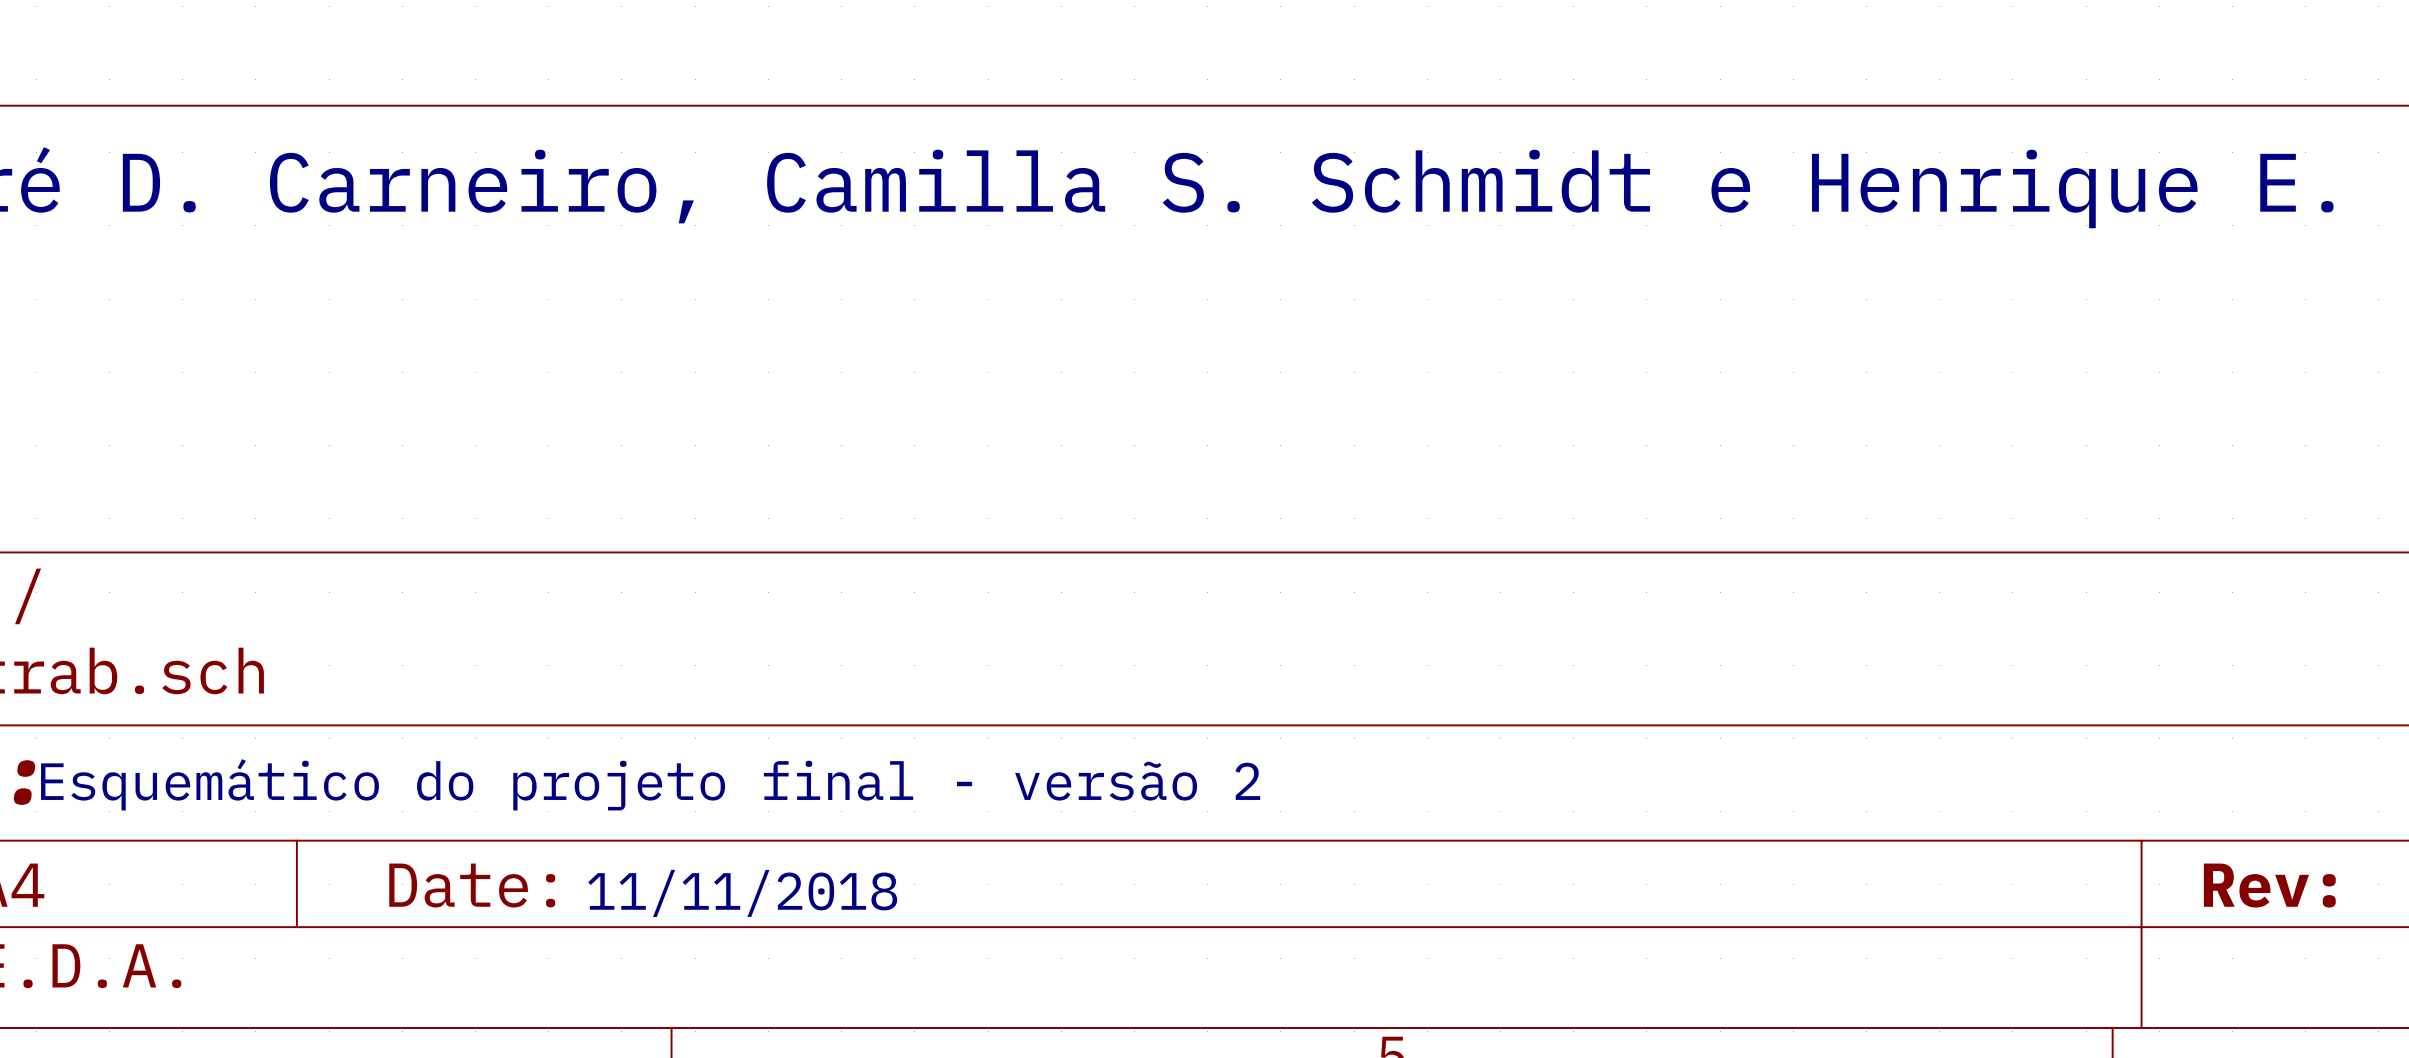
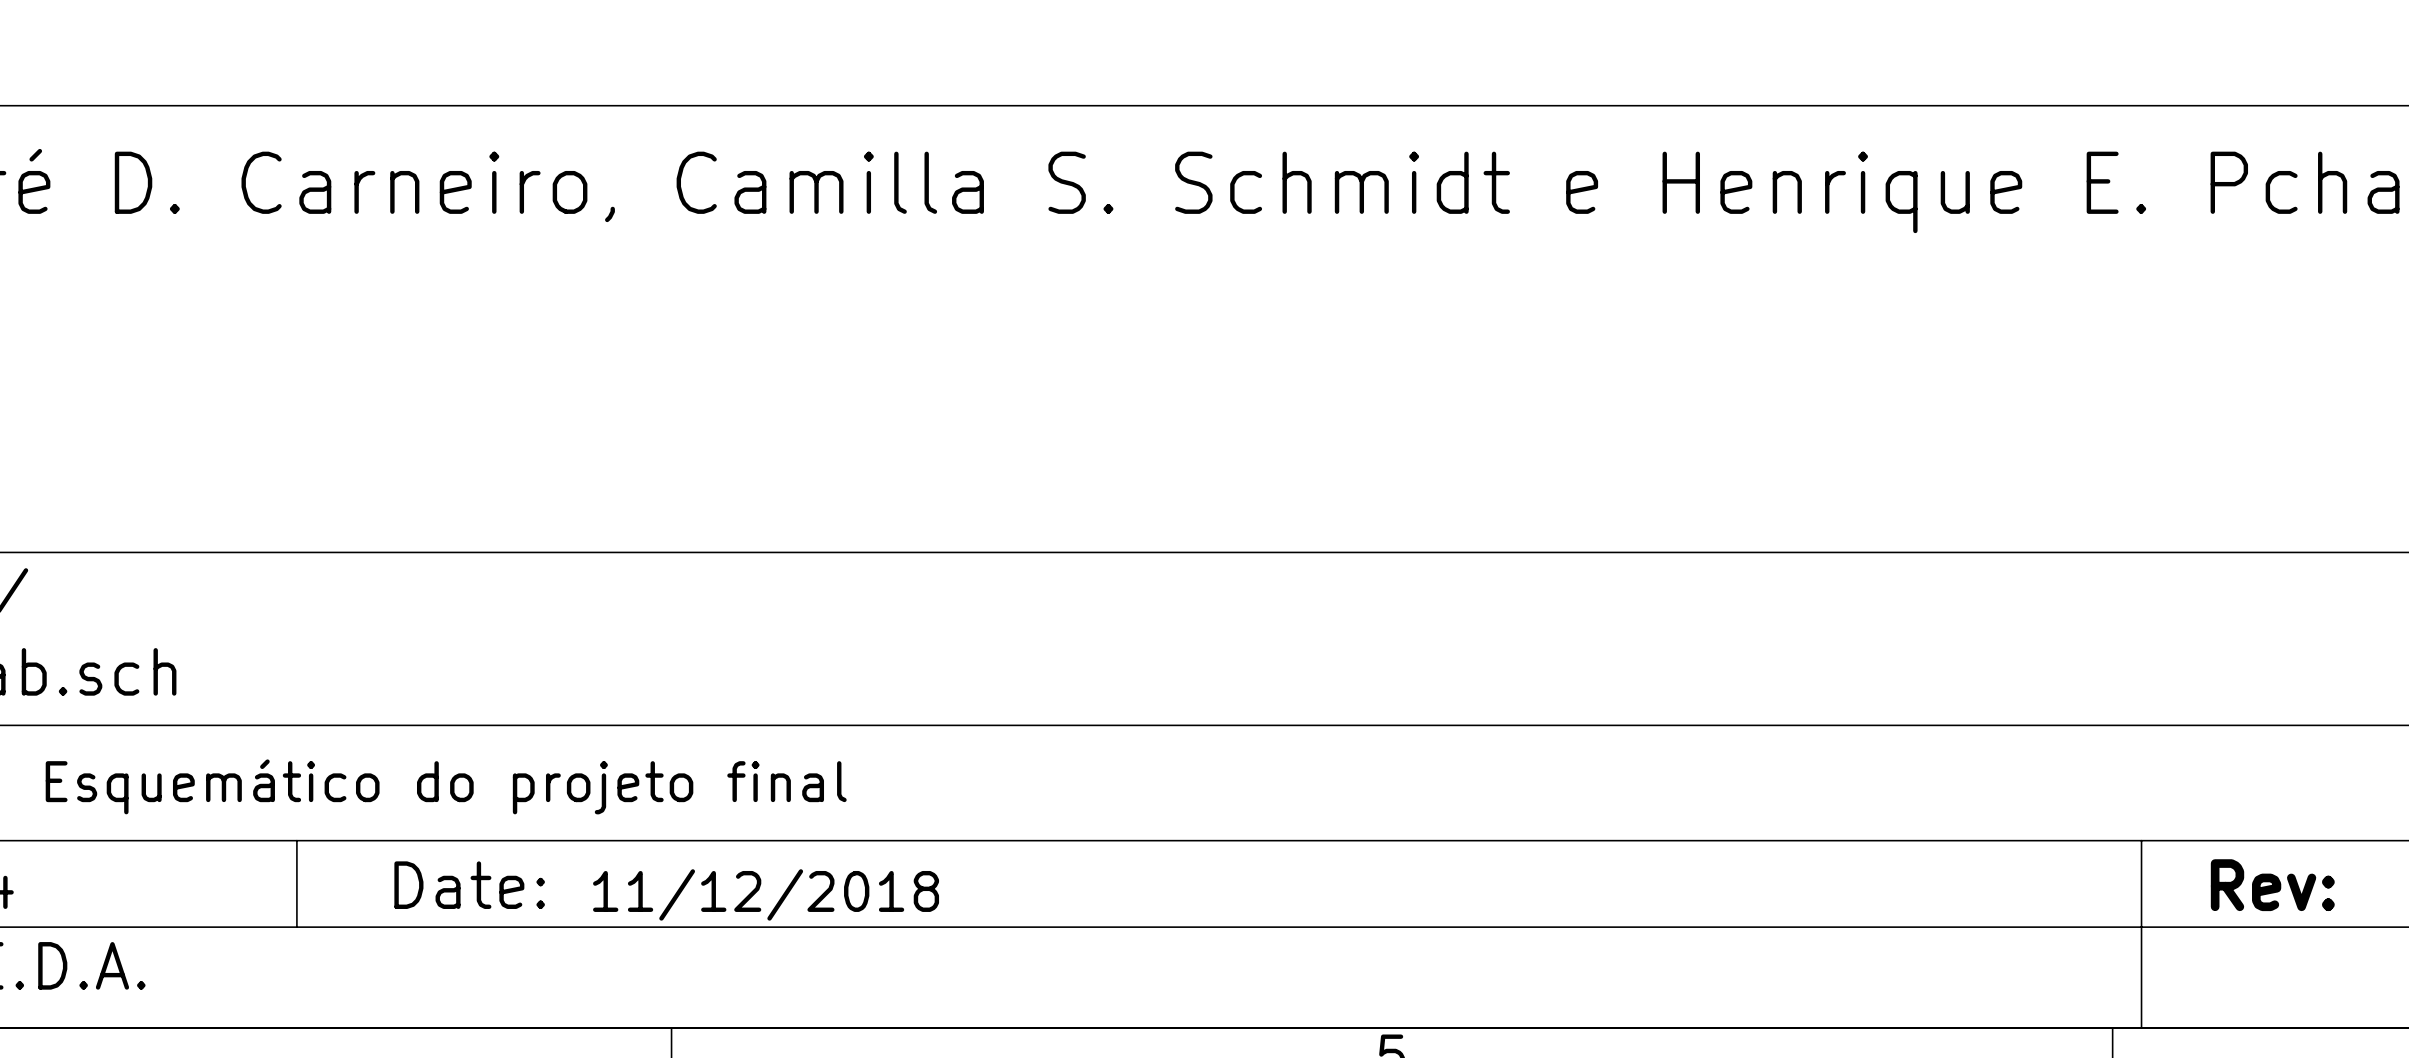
text: Esquemático do projeto final - versão 2 (650, 784) -> Esquemático do projeto final (446, 786)
text: 11/11/2018 (742, 893) -> 11/12/2018 (766, 894)

